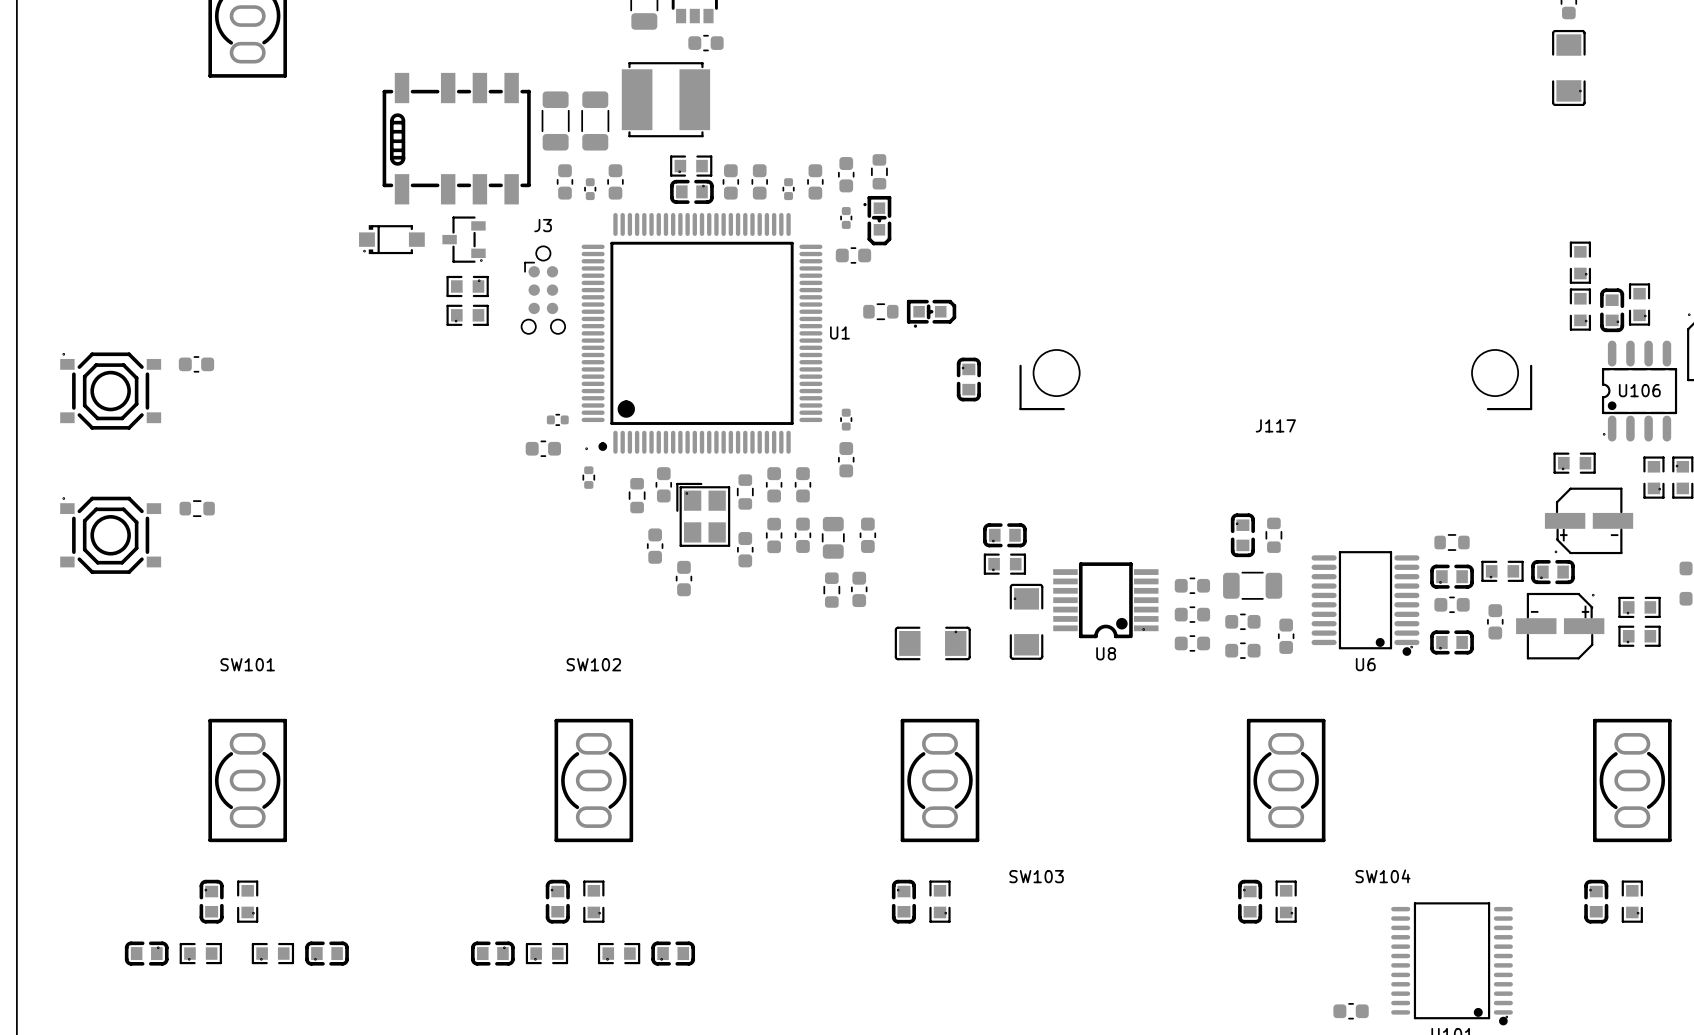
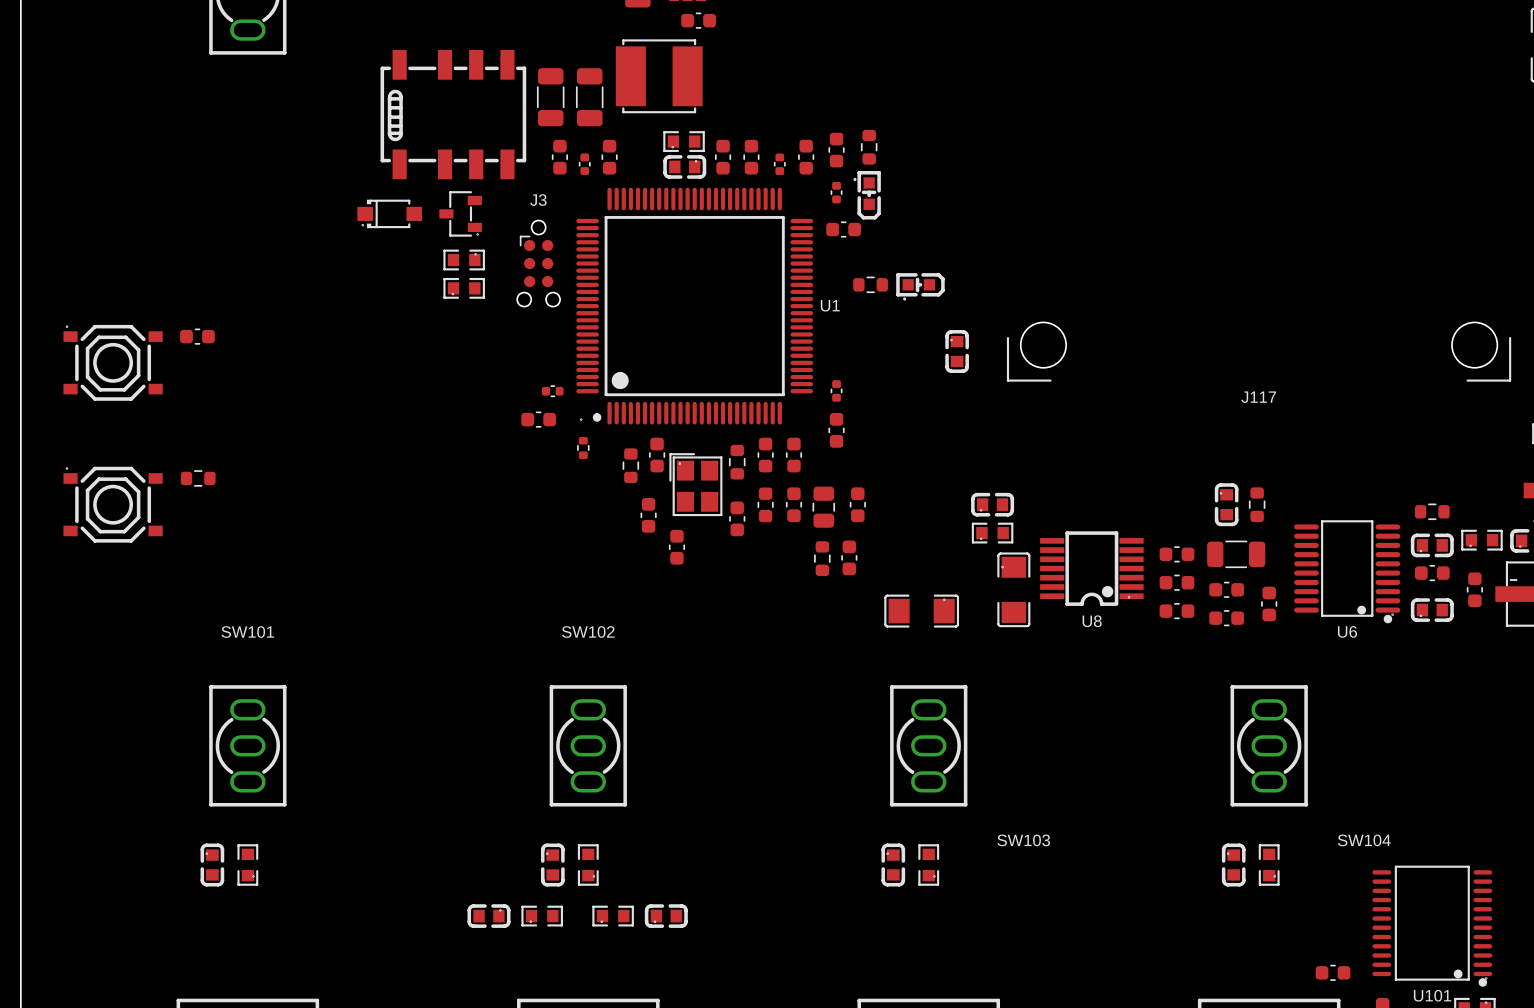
part: (146, 953) -> none
part: (200, 953) -> none
part: (272, 953) -> none
part: (327, 953) -> none

